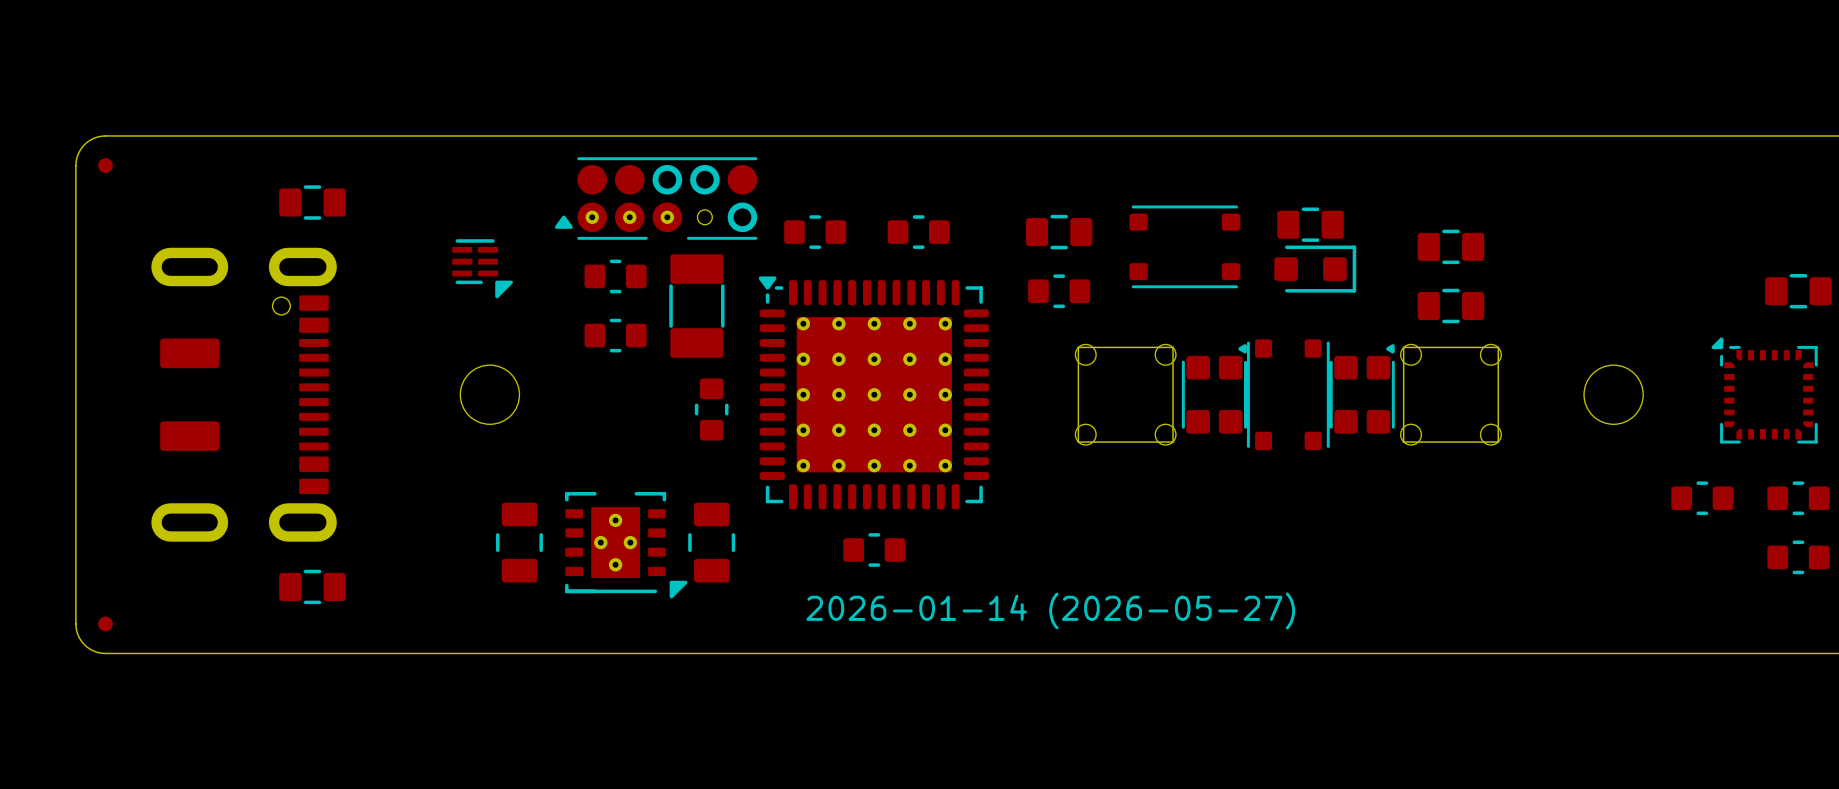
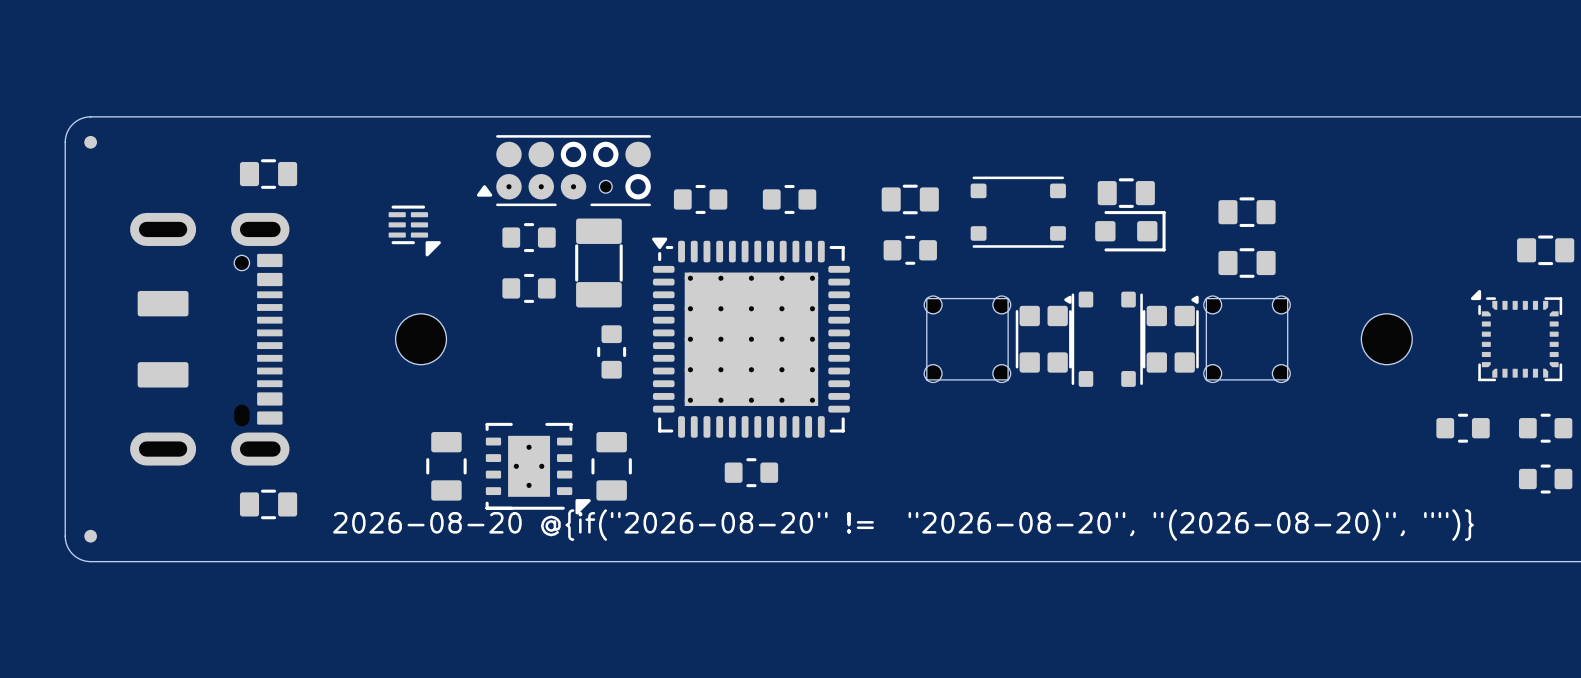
drawing shape: [806, 592, 1296, 630] -> [333, 509, 1474, 541]

